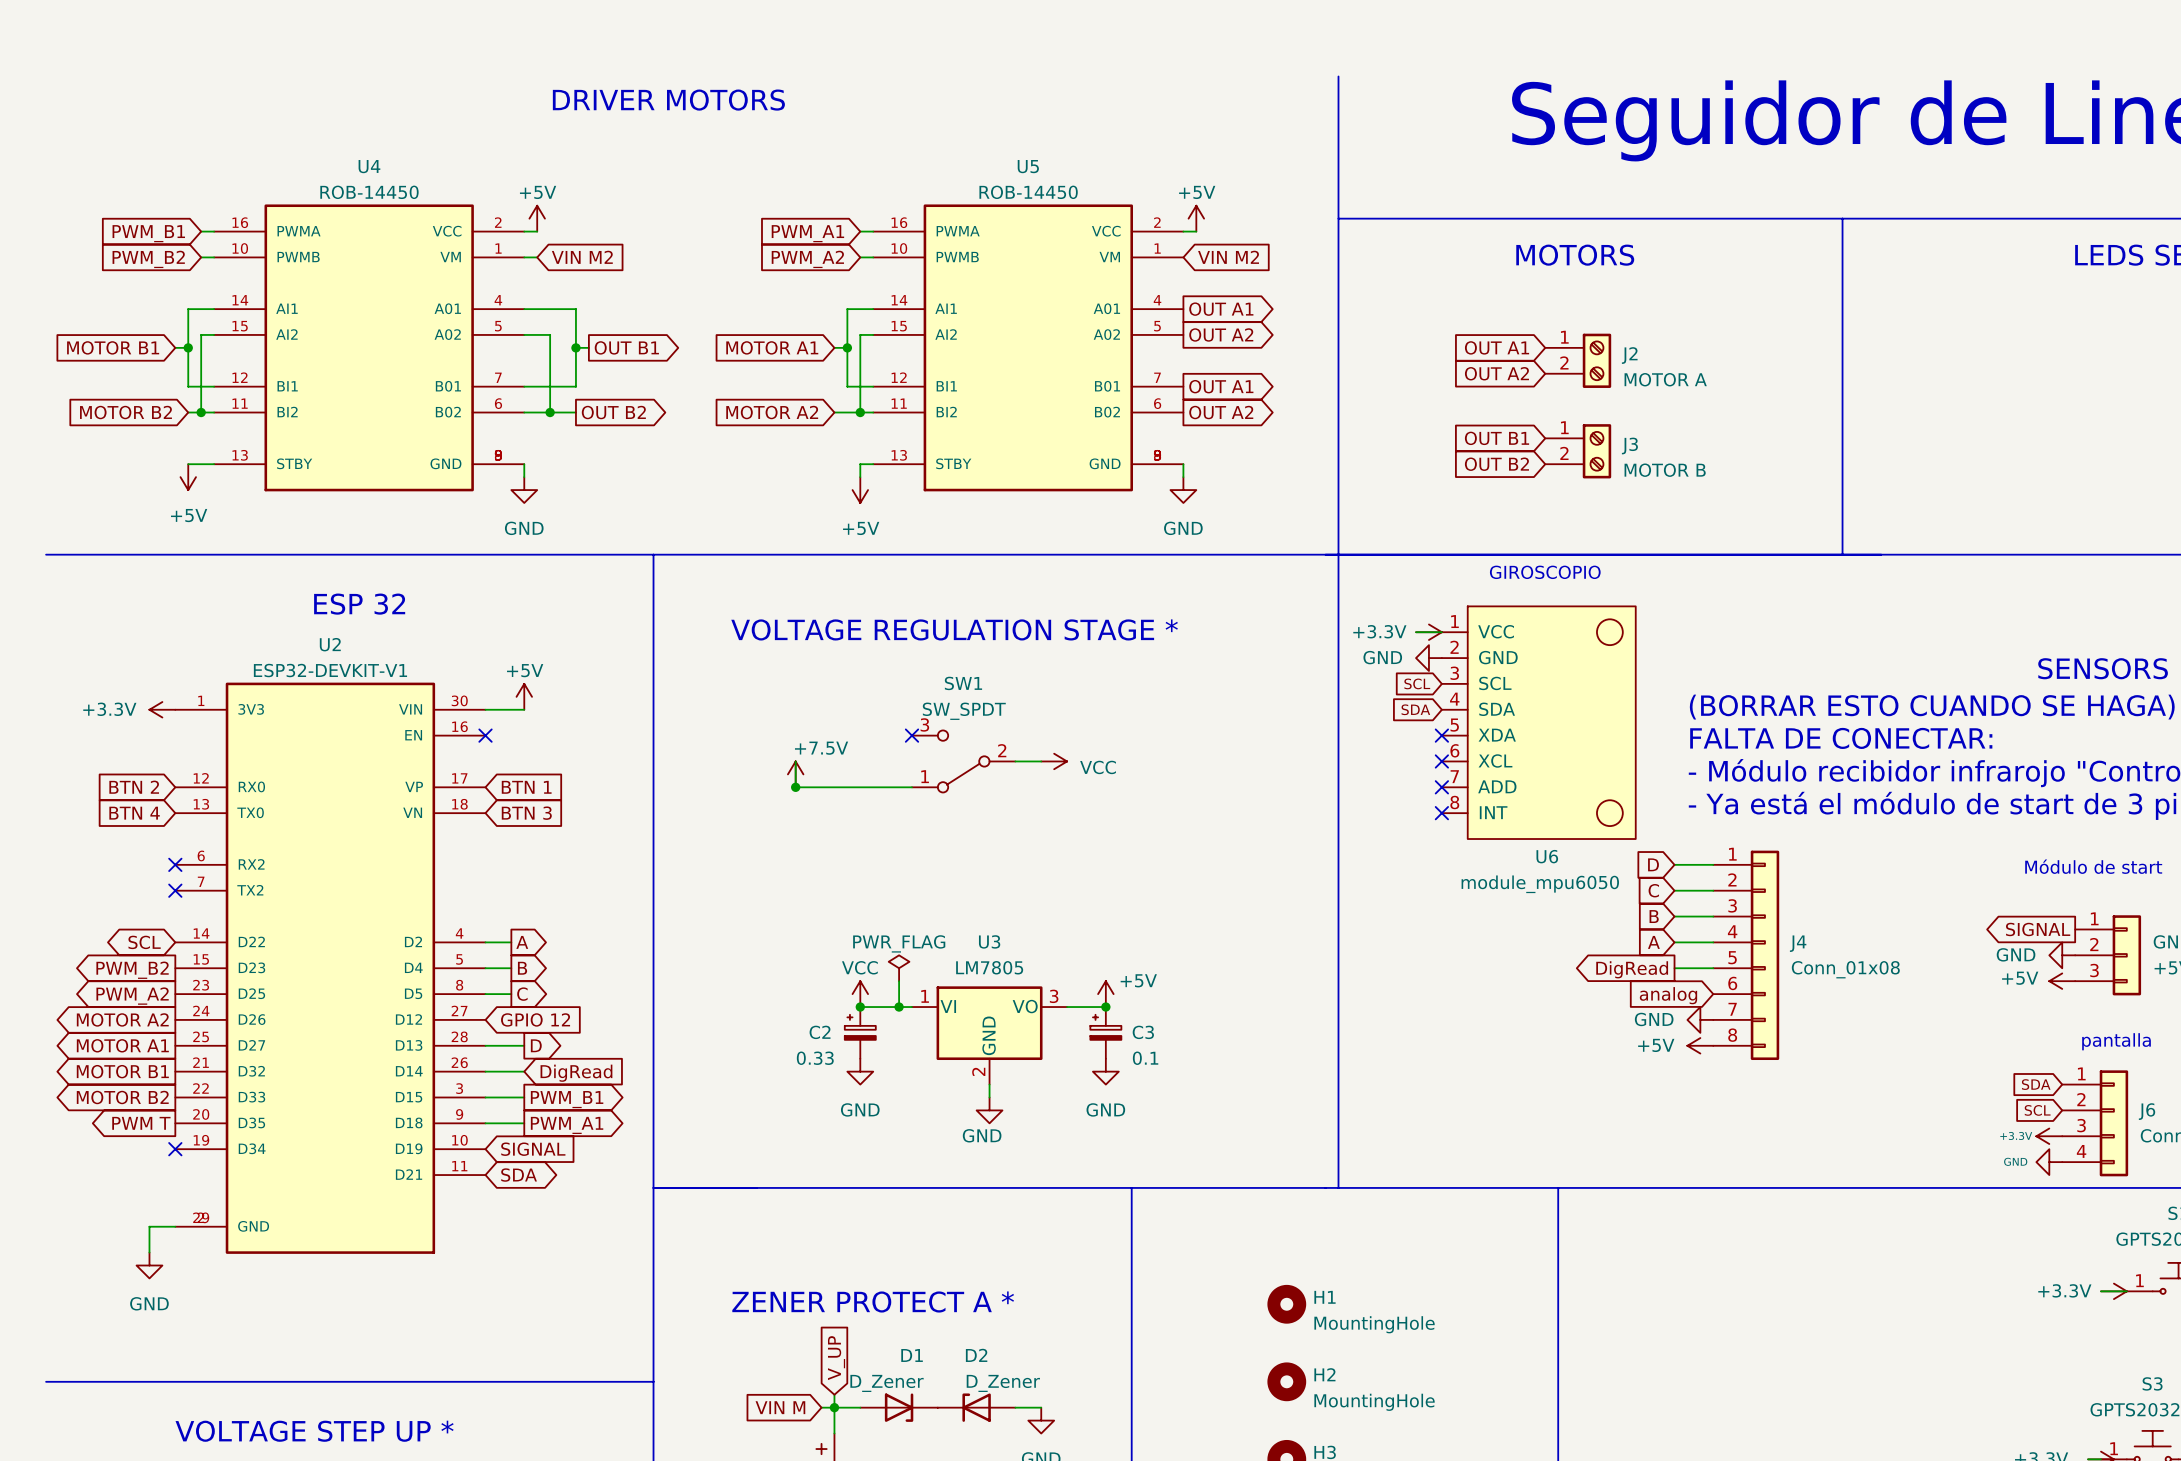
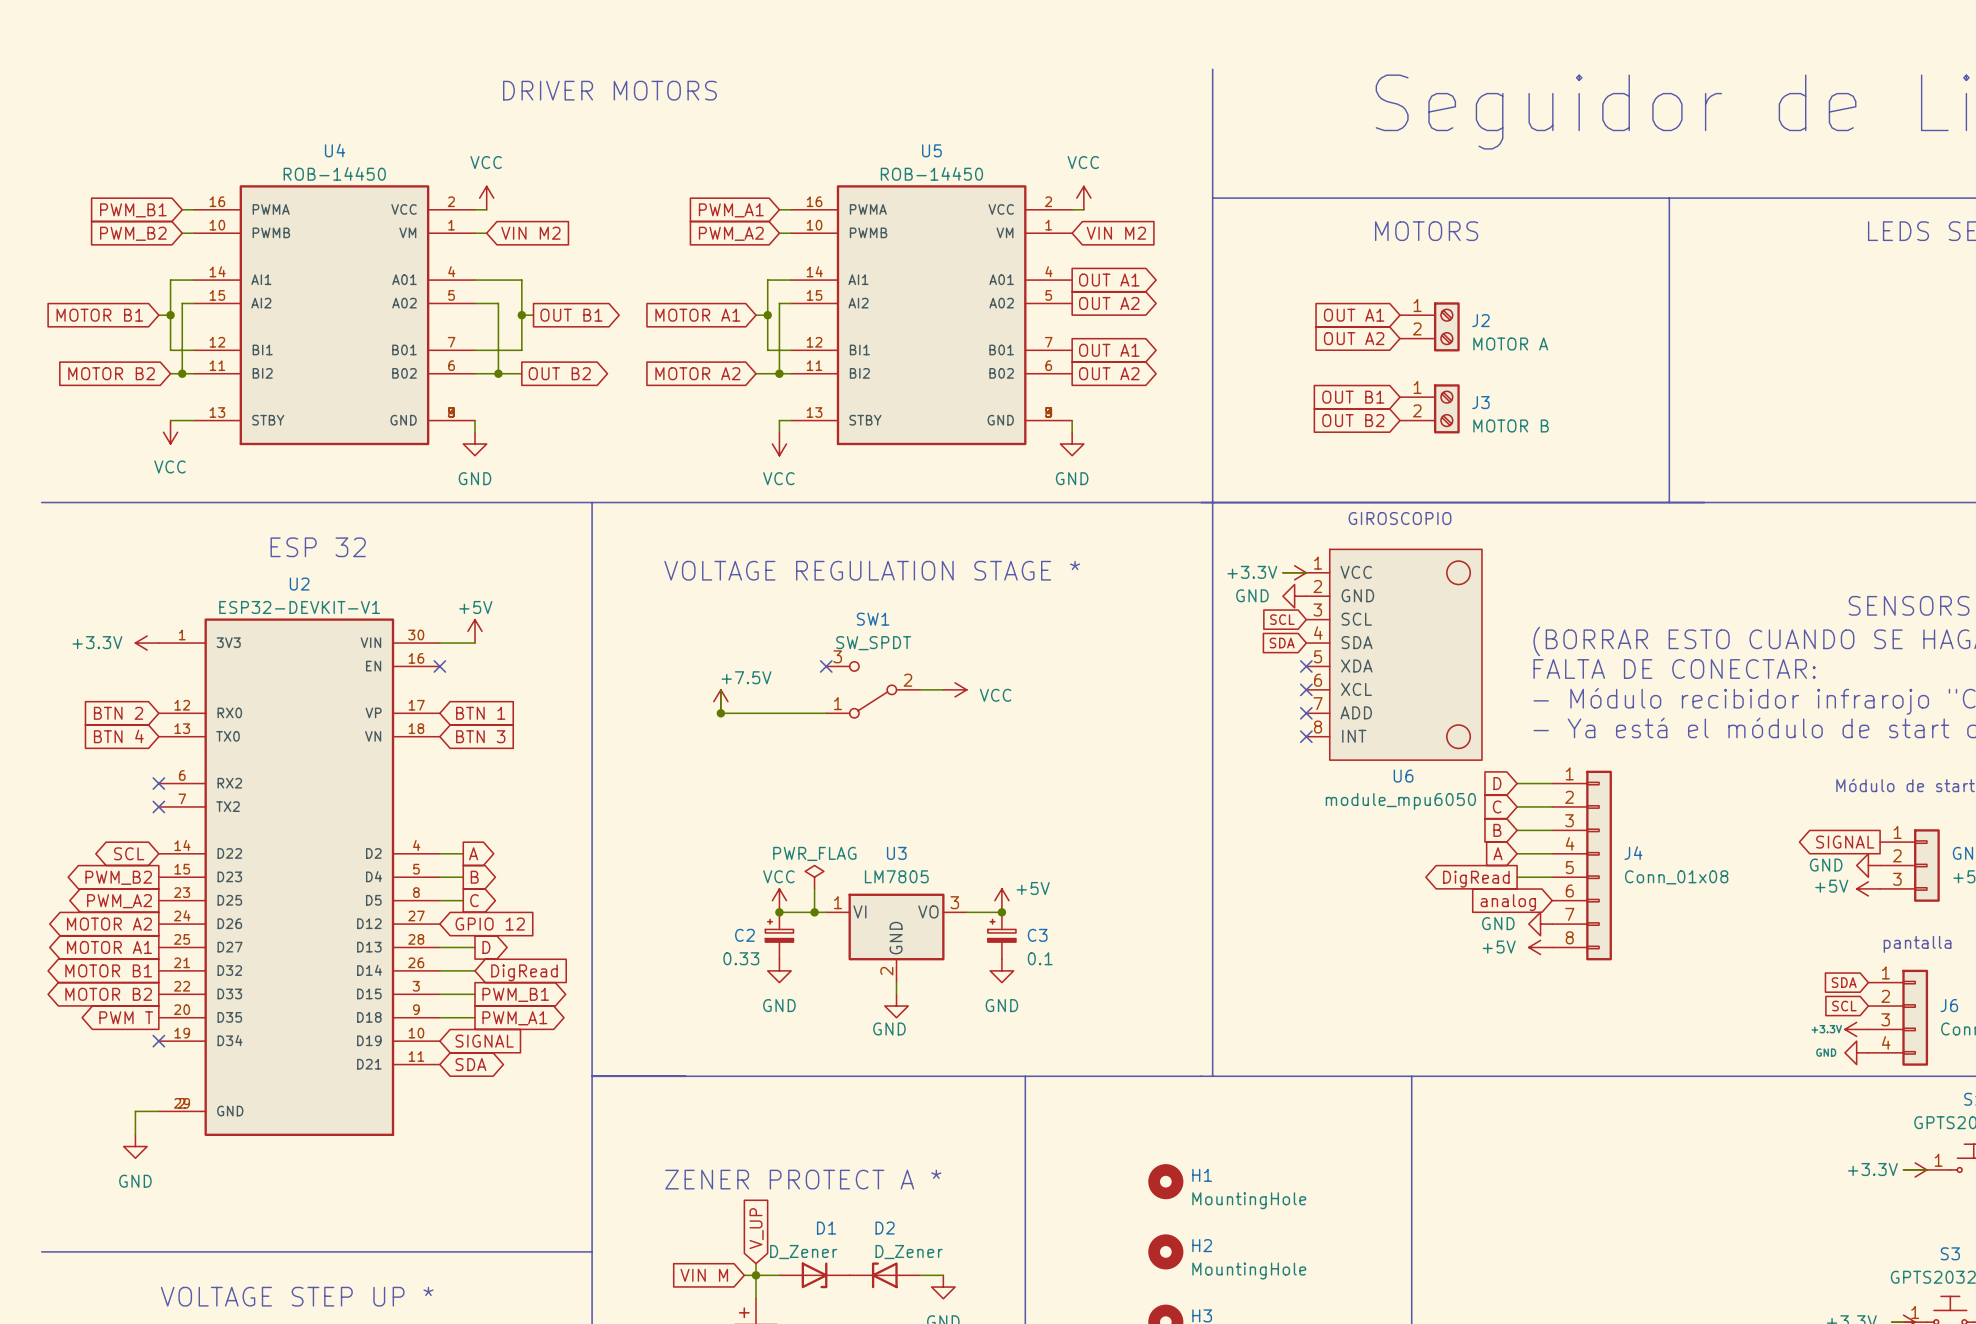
power symbol: +5V (537, 218) -> VCC (486, 198)
power symbol: +5V (1196, 218) -> VCC (1083, 198)
power symbol: +5V (188, 477) -> VCC (170, 432)
power symbol: +5V (860, 490) -> VCC (779, 443)

